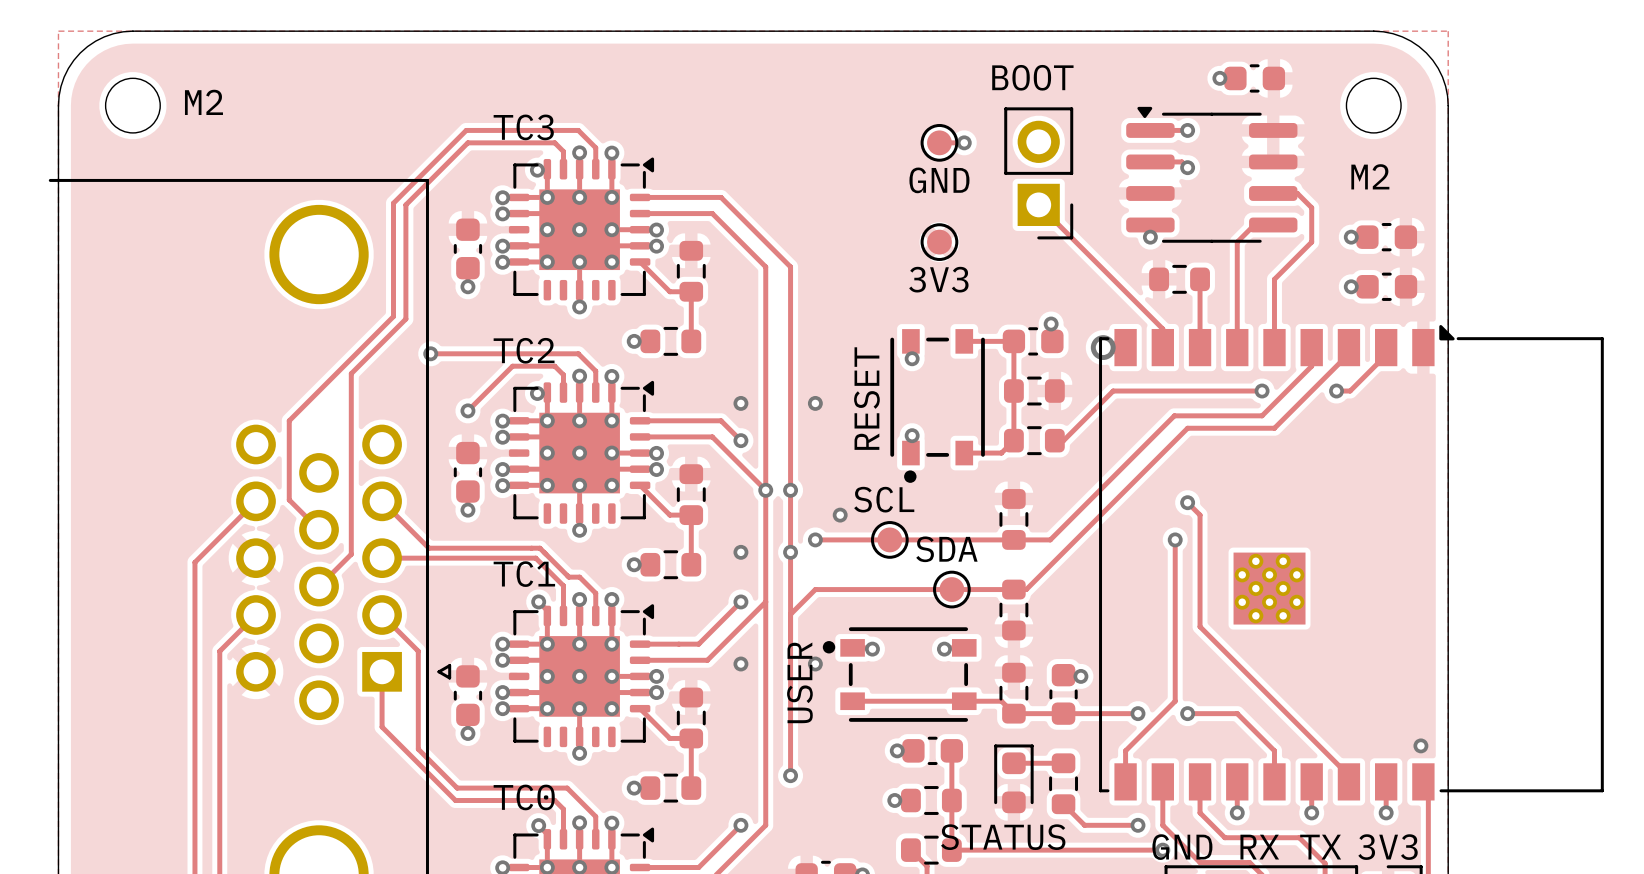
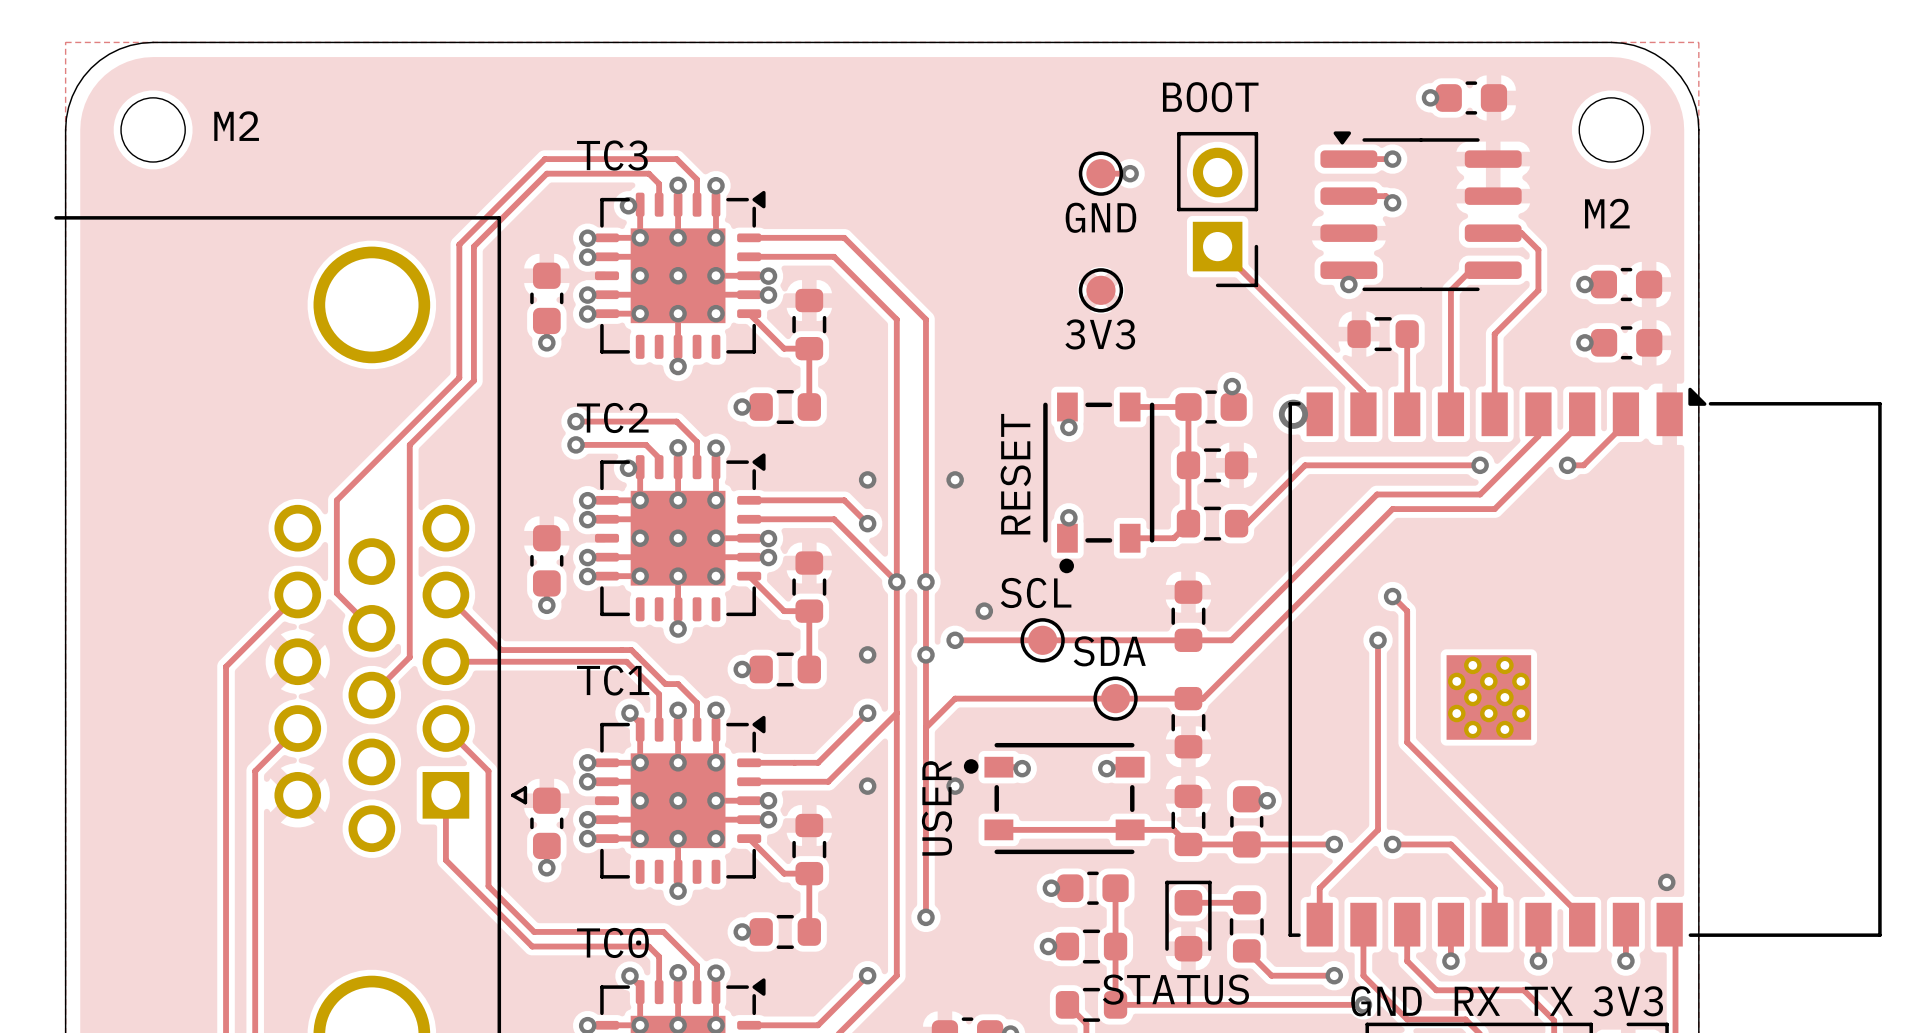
track: (430, 353) (492, 353) -> none
via: (430, 353) -> none
via: none -> (576, 421)
via: none -> (576, 444)
track: (563, 384) (563, 374) (554, 366) (512, 366) (467, 410) -> (659, 458) (645, 444) (576, 444)
via: (467, 410) -> none

